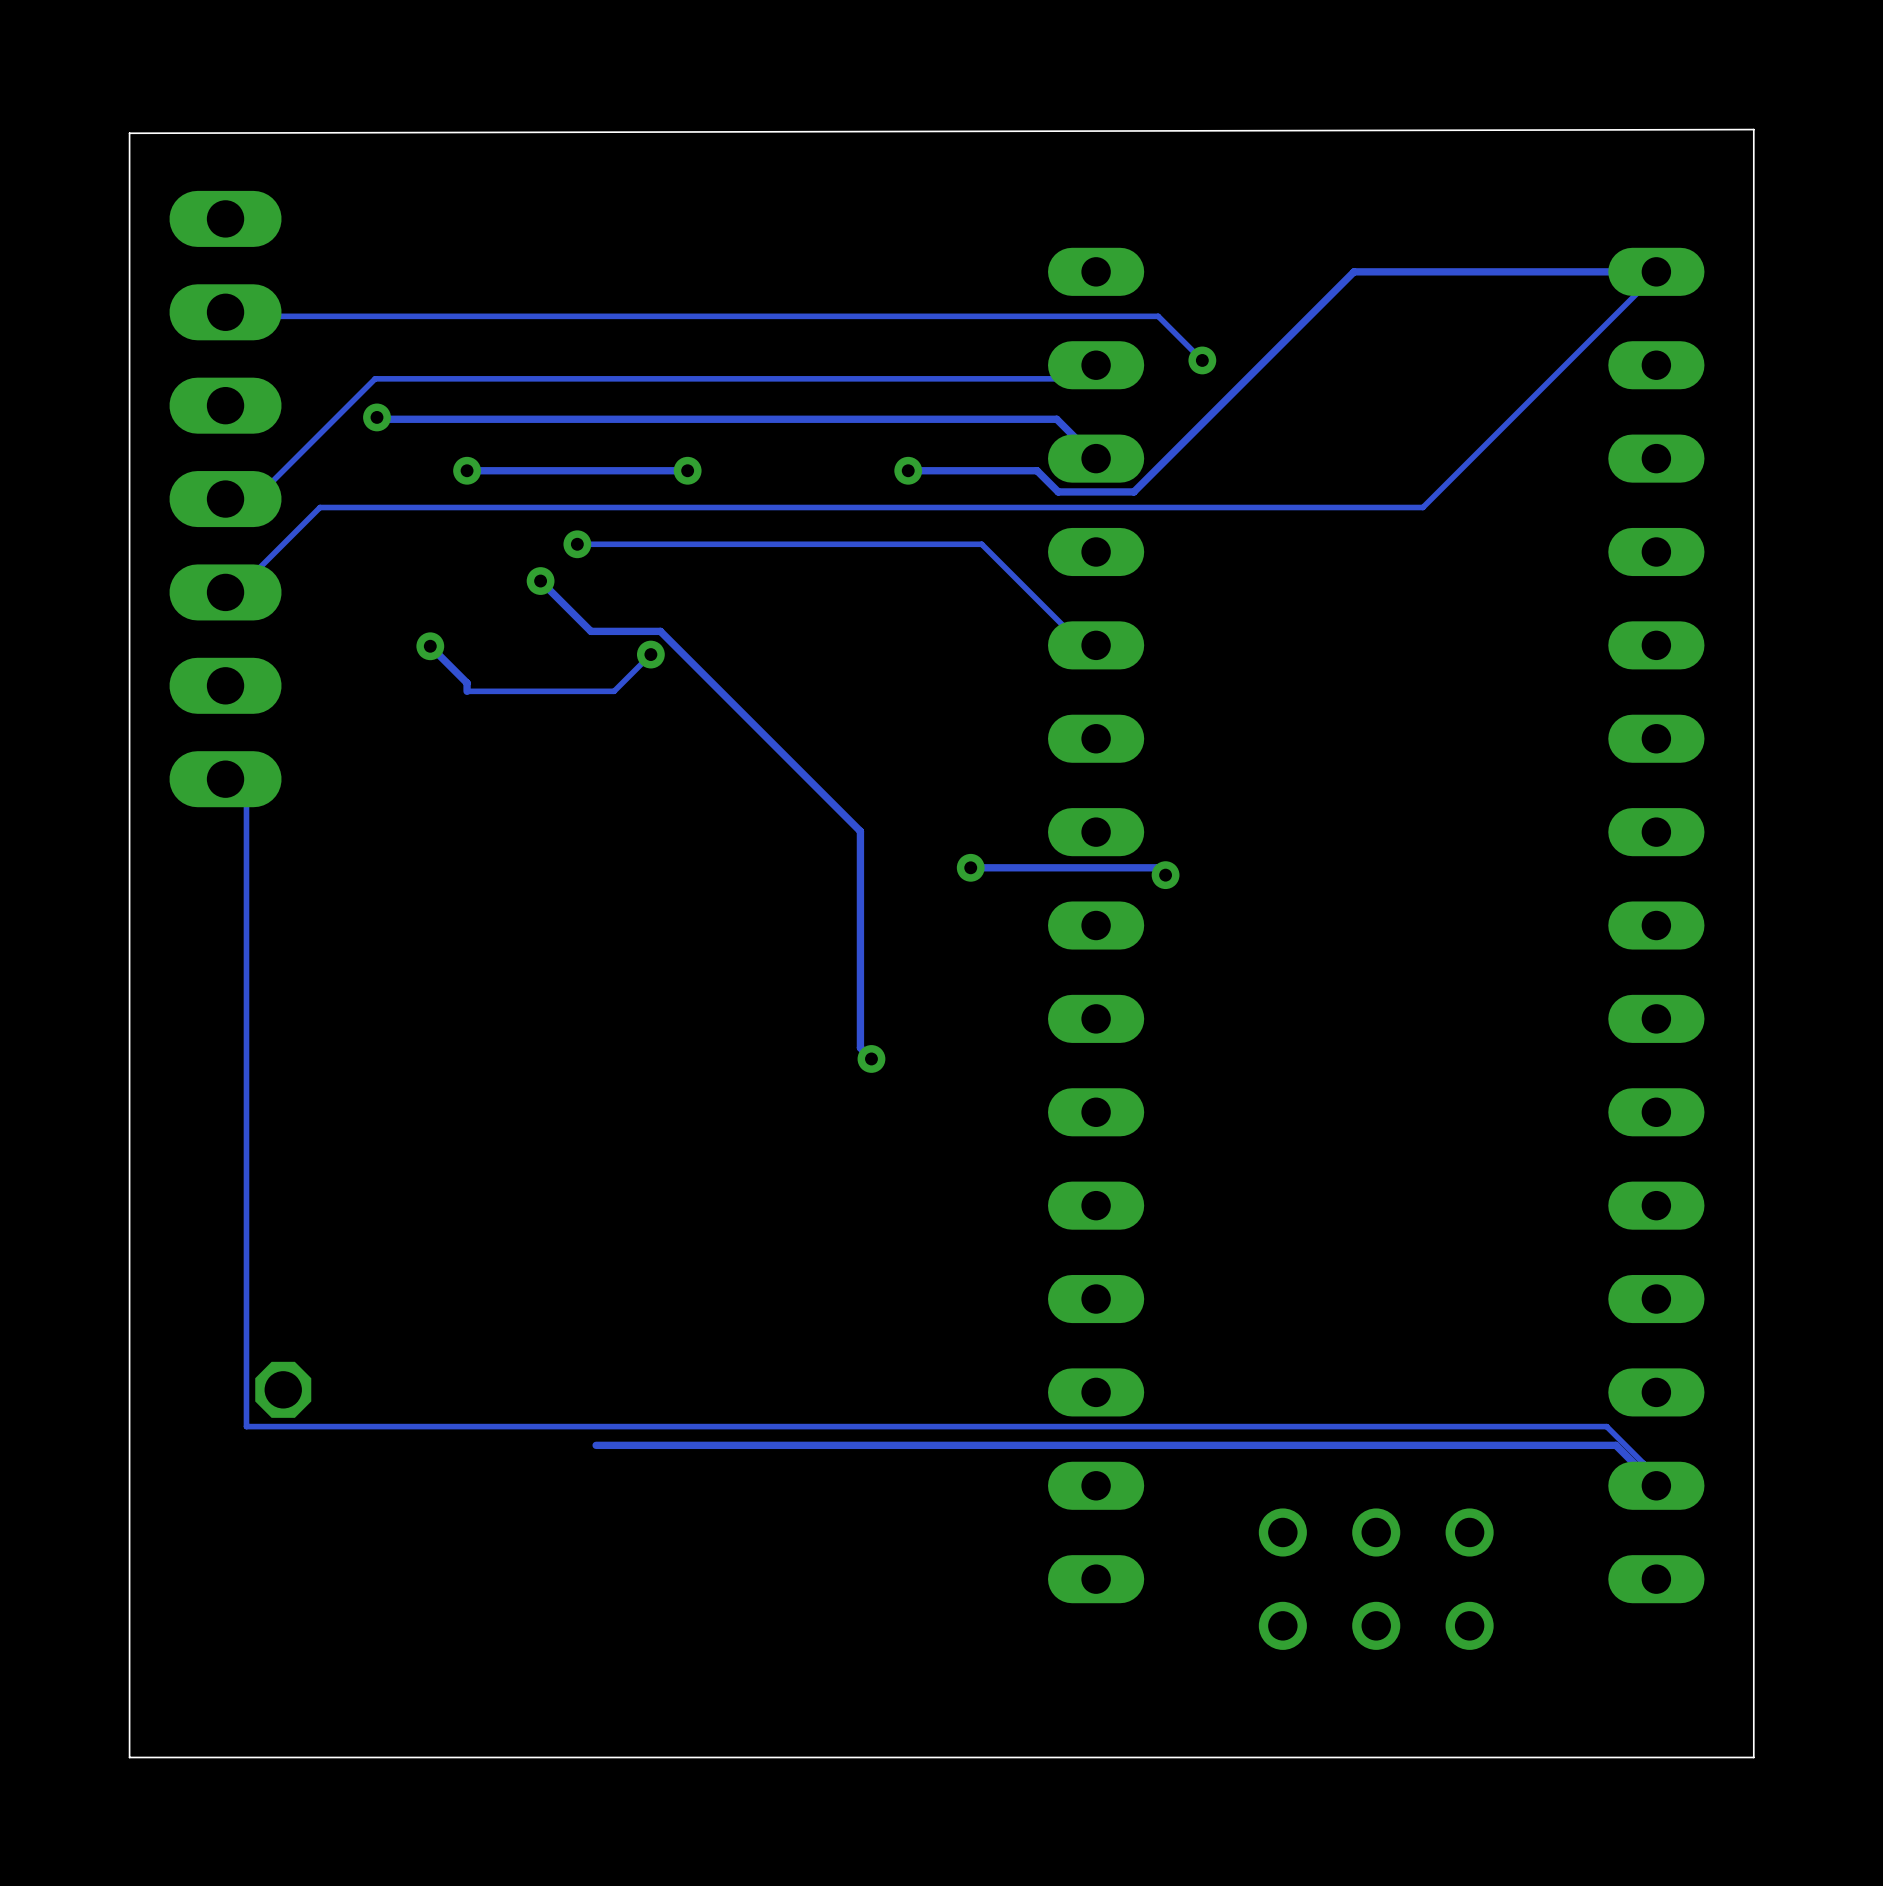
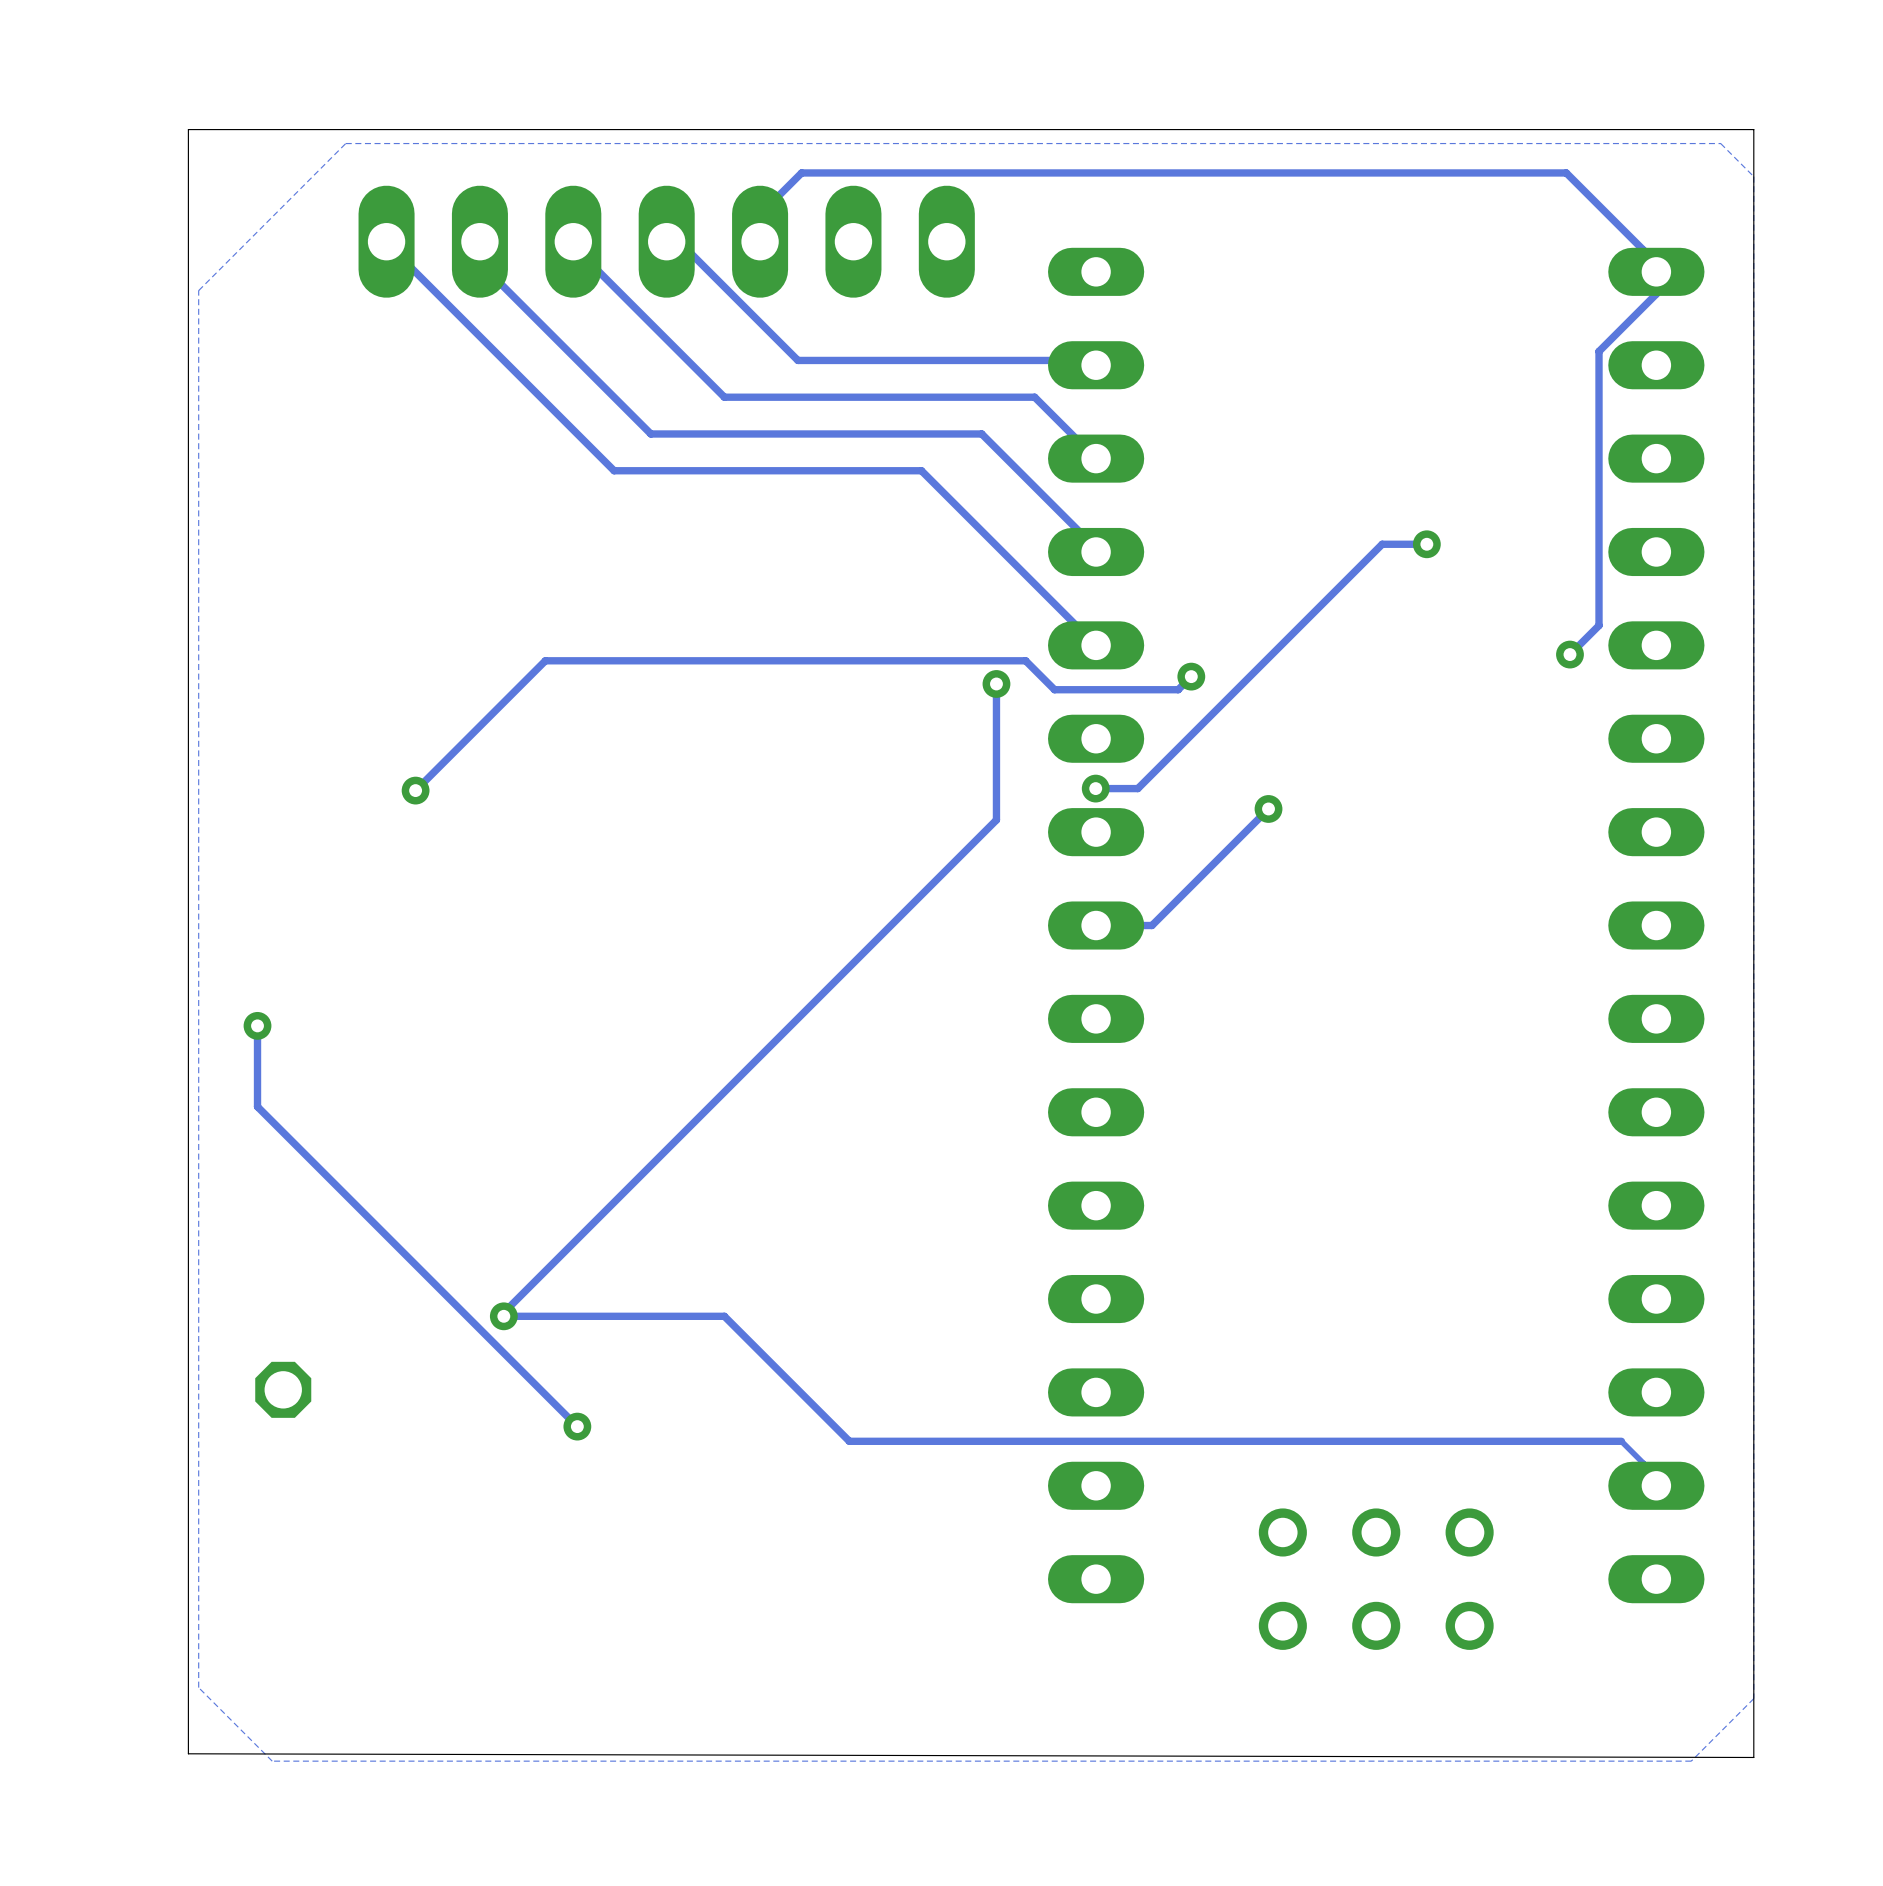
board edge: (1753, 129) (129, 133) (129, 1757) (1753, 1757) -> (1753, 129) (188, 129) (188, 1753) (1753, 1757)
zone outline: none -> (1720, 143) (345, 143) (198, 290) (198, 1687) (272, 1761) (1691, 1761) (1753, 1698) (1753, 176) (1720, 143)
track: none -> (479, 241) (467, 250) (650, 433) (981, 433) (1092, 544) (1096, 551)
track: none -> (760, 241) (761, 213) (801, 172) (1566, 172) (1643, 250) (1656, 271) (1656, 294) (1599, 351) (1599, 625) (1569, 654)
track: (225, 312) (232, 316) (1158, 316) (1202, 360) -> none
via: (1202, 360) -> none
track: (1096, 365) (1082, 378) (375, 378) (246, 507) (225, 499) -> (1096, 365) (1092, 360) (797, 360) (687, 250) (666, 241)
track: (376, 417) (378, 415) (382, 419) (1056, 419) -> (573, 241) (577, 250) (724, 397) (1034, 397) (1056, 419)
via: (376, 417) -> none
via: (467, 470) -> none
track: (614, 470) (467, 470) -> (614, 470) (386, 241)
via: (687, 470) -> none
track: none -> (908, 470) (687, 470)
via: (908, 470) -> none
track: (921, 470) (1037, 470) (1058, 491) (1133, 491) (1354, 271) (1656, 271) (1422, 507) (320, 507) (246, 581) (225, 592) -> none
part rotation: 0° (225, 499) -> 90° clockwise (666, 241)
part position: (225, 499) -> (666, 241)
track: (577, 544) (981, 544) (1092, 654) (1096, 645) -> (921, 470) (1096, 645)
via: (577, 544) -> none
track: none -> (1426, 544) (1382, 544) (1137, 788) (1095, 788)
via: none -> (1426, 544)
track: (540, 581) (590, 631) (660, 631) (860, 831) (860, 1047) (871, 1058) -> none
via: (540, 581) -> none
track: (430, 646) (467, 683) (467, 691) (614, 691) (650, 654) -> none
via: (430, 646) -> none
via: (650, 654) -> none
via: none -> (1569, 654)
track: none -> (1191, 676) (1178, 689) (1054, 689) (1025, 660) (545, 660) (415, 790)
via: none -> (1191, 676)
via: none -> (996, 683)
track: (225, 779) (246, 801) (246, 1426) (1606, 1426) (1621, 1441) -> (996, 683) (996, 820) (503, 1312) (503, 1316) (724, 1316) (849, 1441) (1621, 1441)
via: none -> (1095, 788)
via: none -> (415, 790)
track: none -> (1268, 808) (1151, 925) (1096, 925)
via: none -> (1268, 808)
track: (970, 867) (1158, 867) (1165, 875) -> none
via: (970, 867) -> none
via: (1165, 875) -> none
track: none -> (257, 1025) (257, 1106) (577, 1426)
via: none -> (257, 1025)
via: (871, 1058) -> none
via: none -> (503, 1316)
via: none -> (577, 1426)
track: (596, 1445) (1615, 1445) (1656, 1485) -> none

